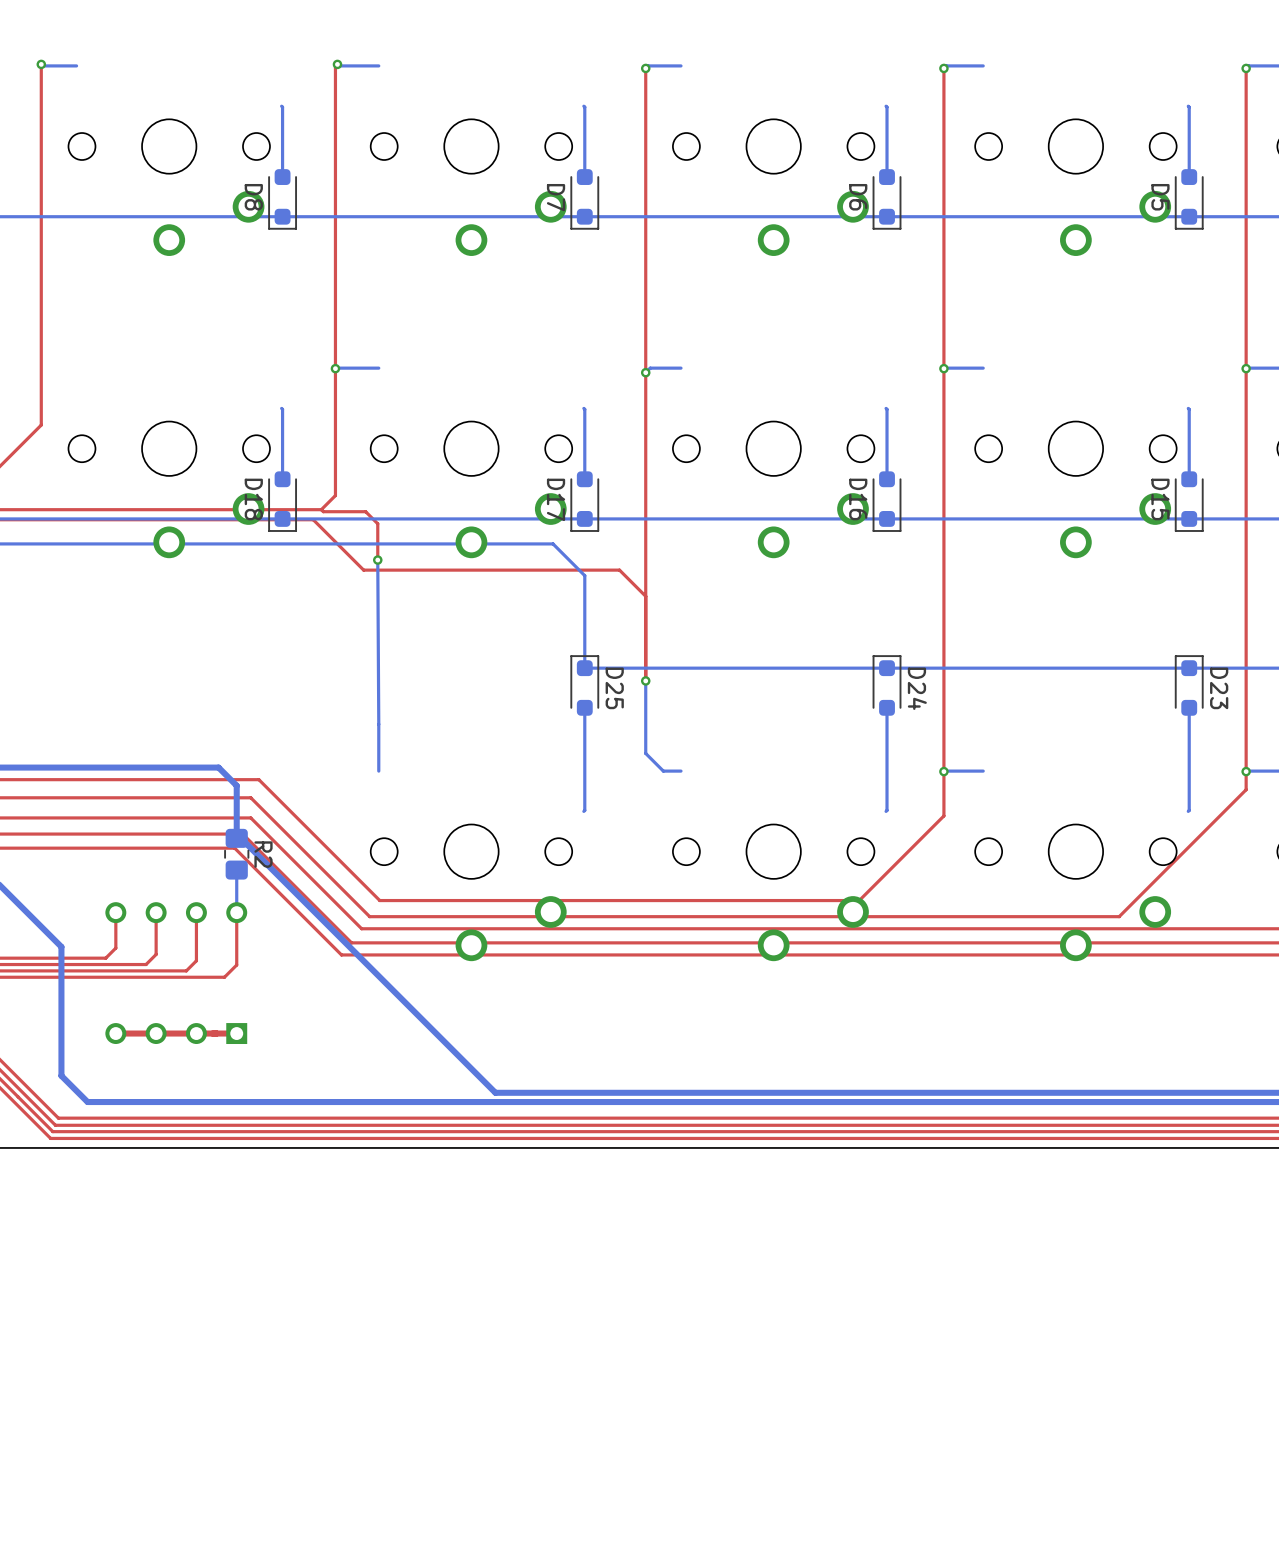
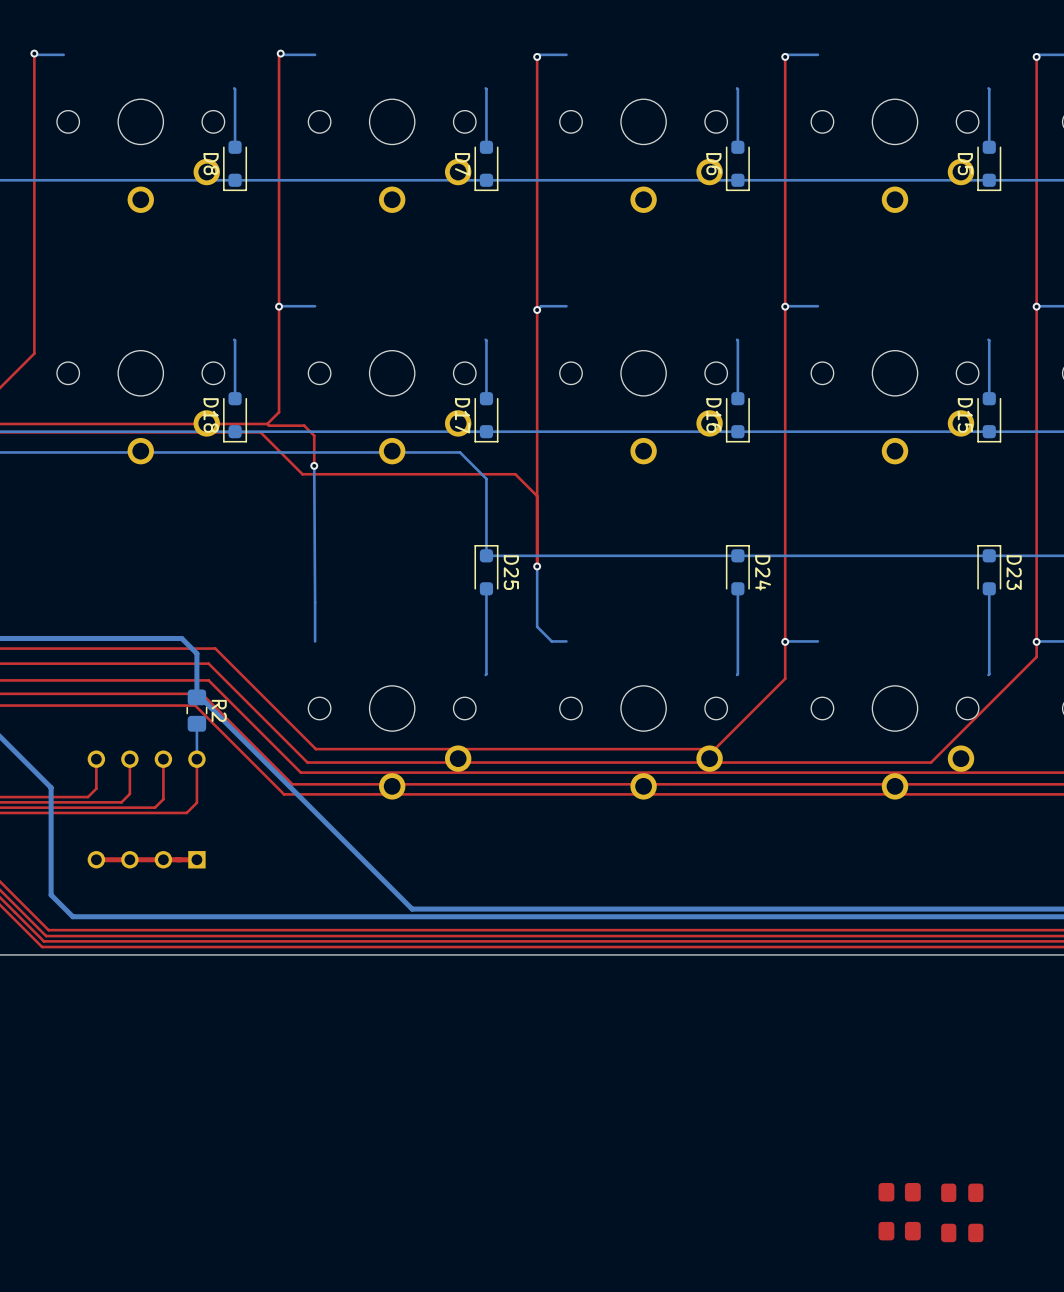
part: none -> (899, 1192)
part: none -> (962, 1192)
part: none -> (899, 1231)
part: none -> (962, 1232)

